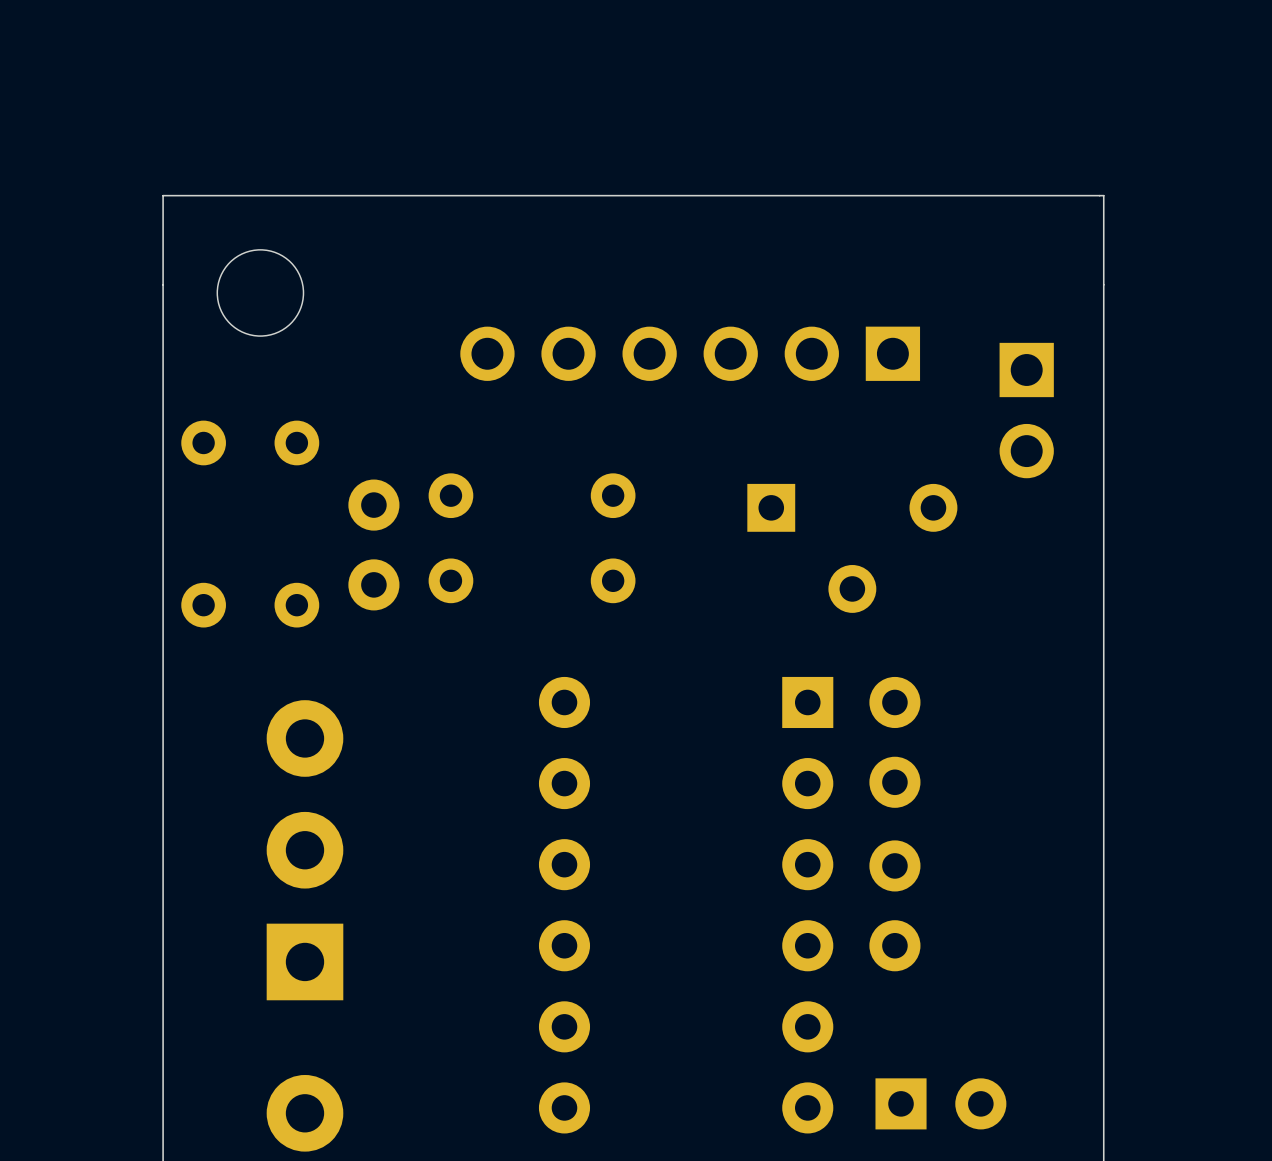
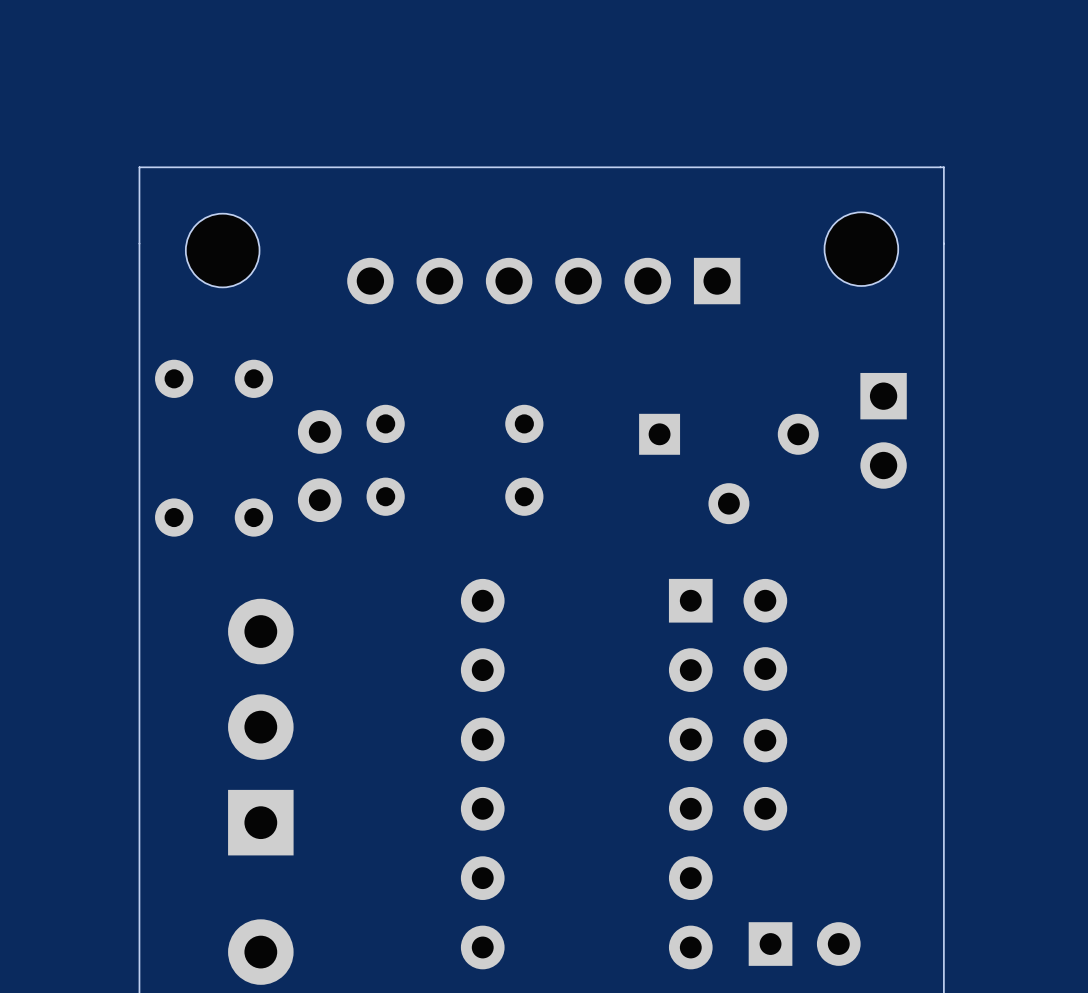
part: none -> (861, 249)
part position: (690, 353) -> (543, 281)
part position: (1026, 410) -> (883, 430)

